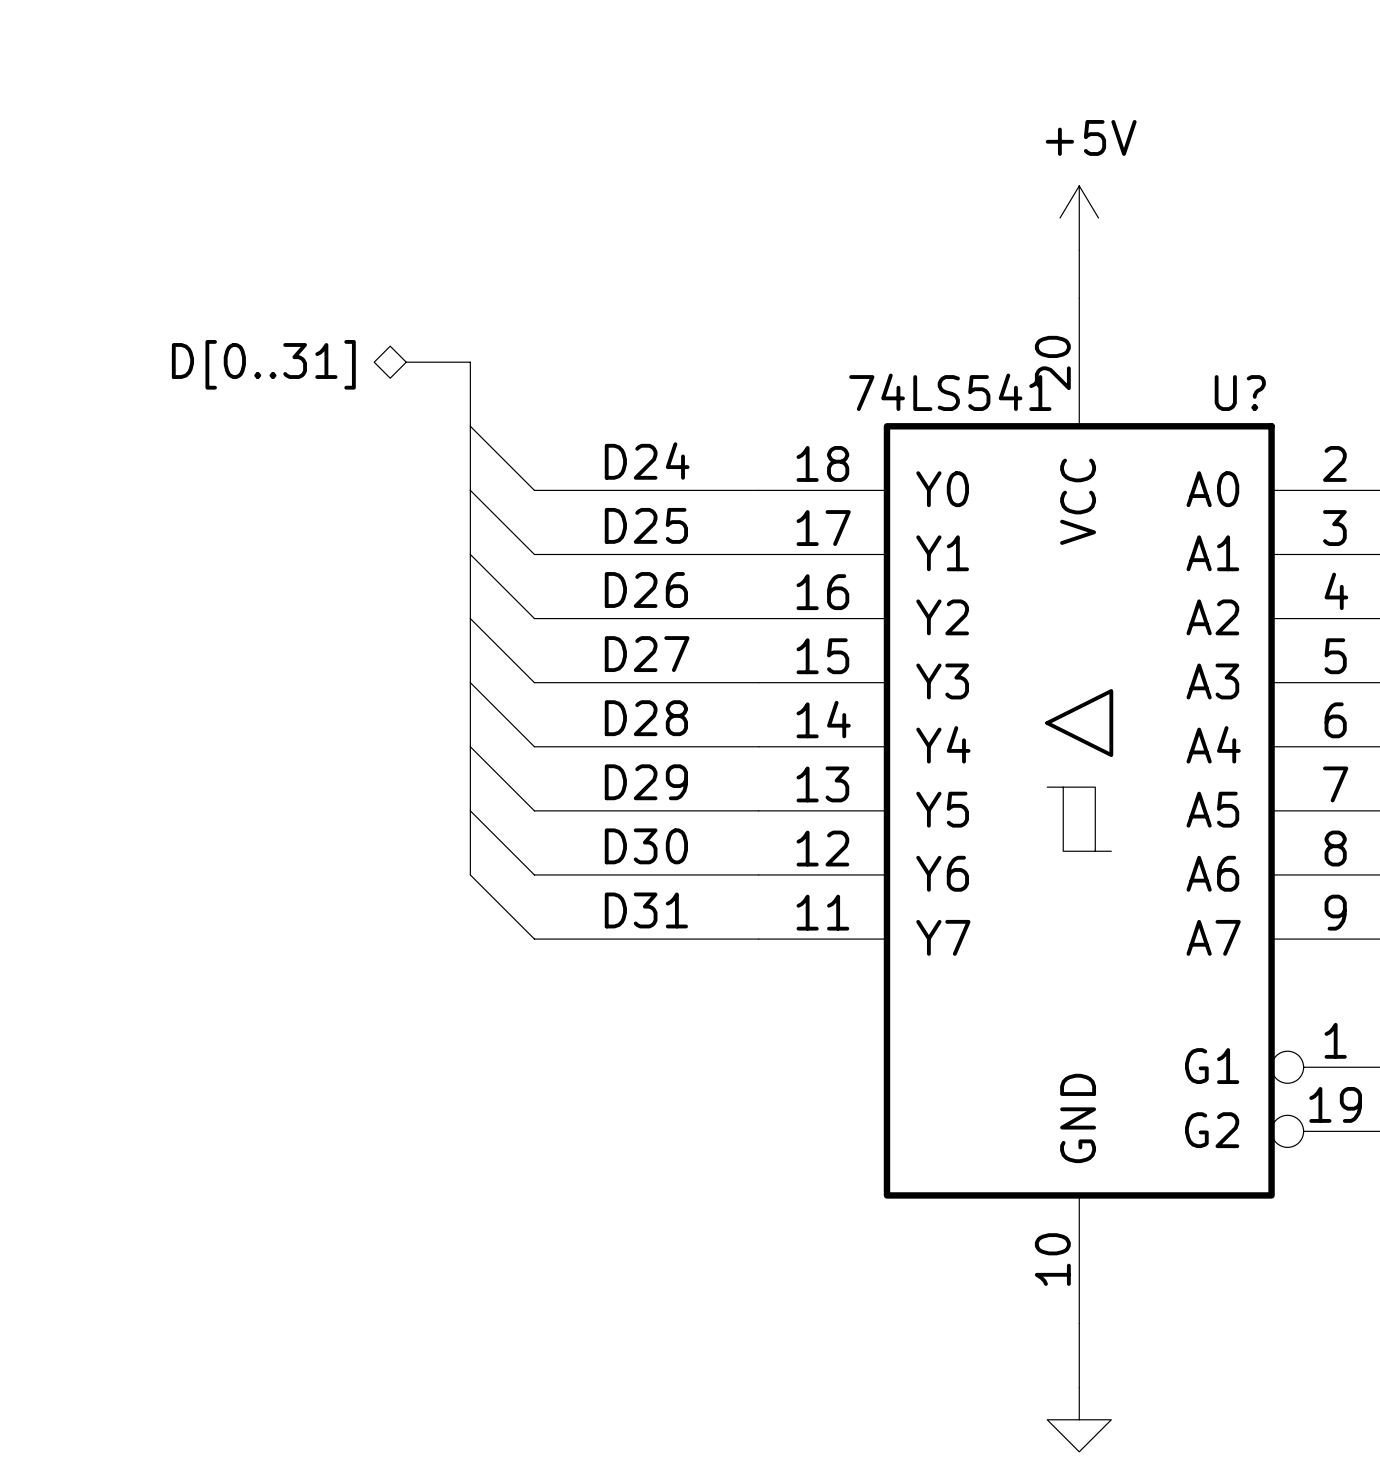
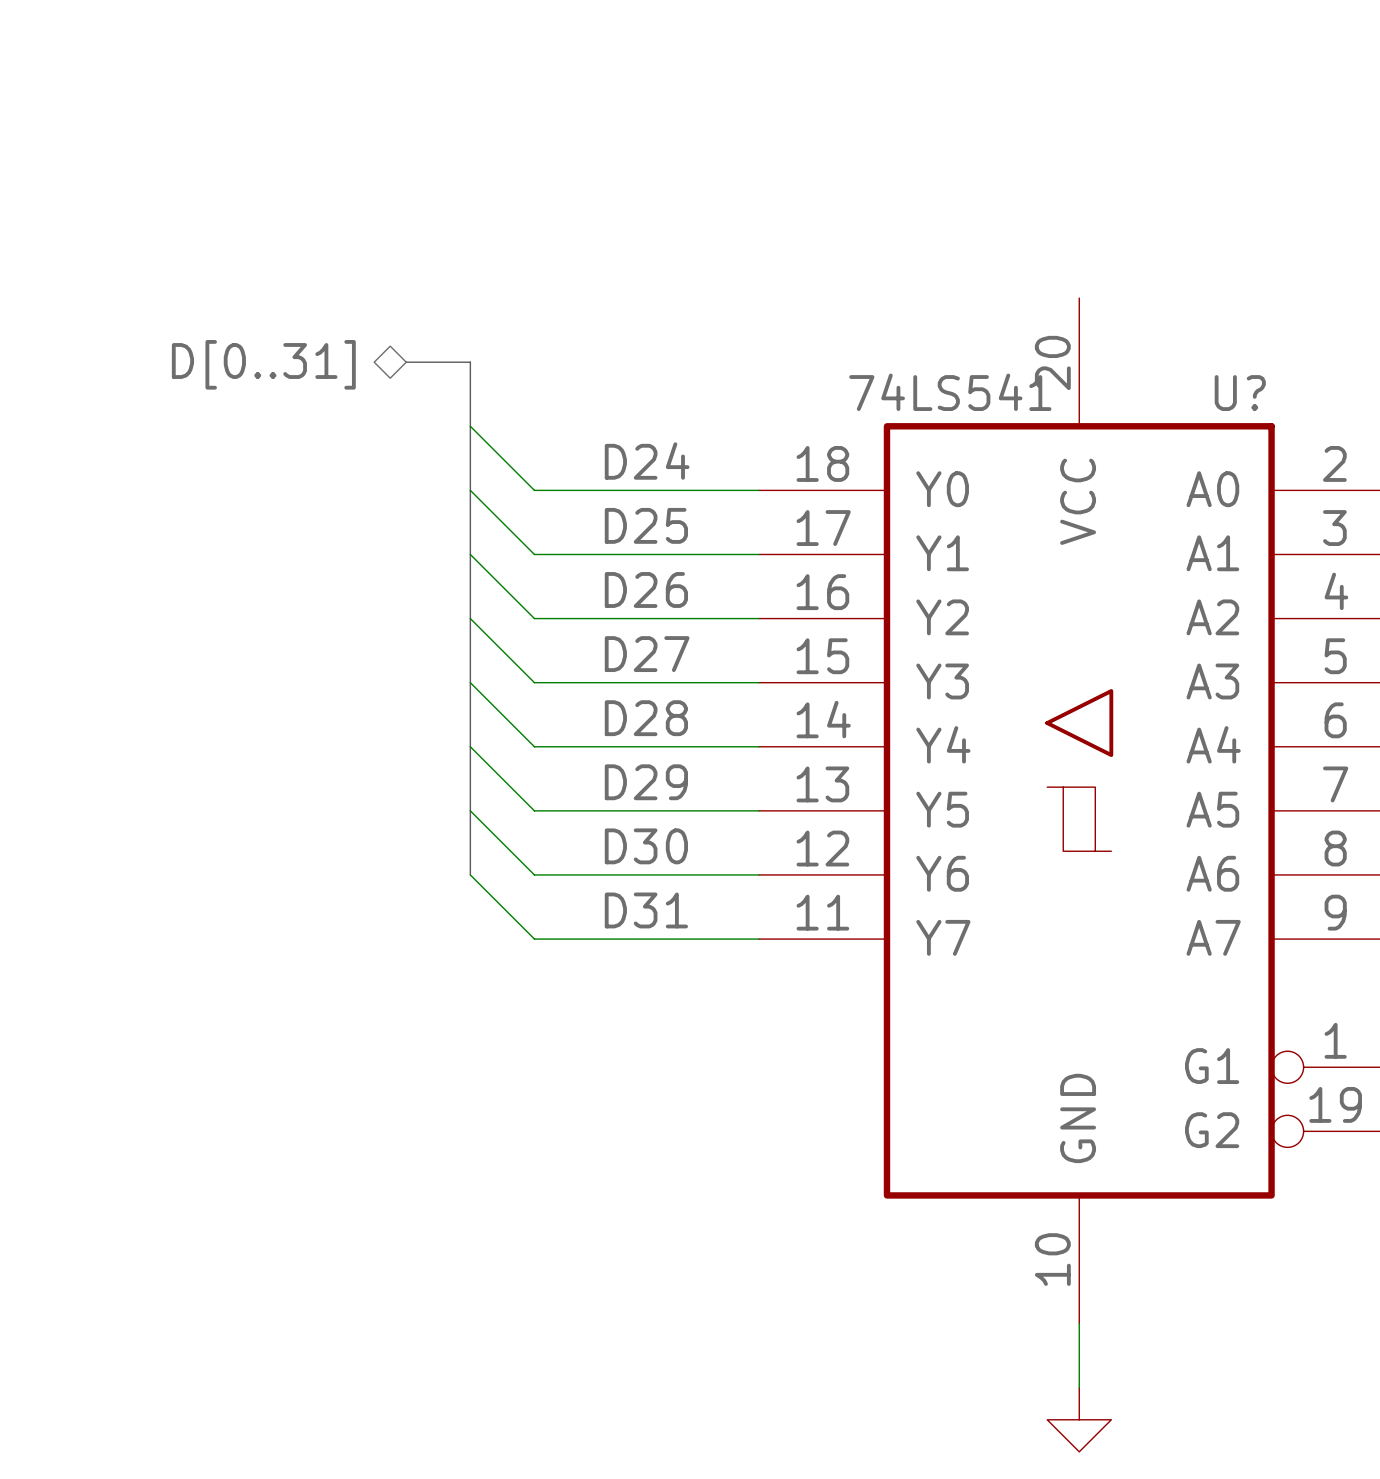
power symbol: +5V (1079, 217) -> none
wire: (1079, 250) (1079, 298) -> none

